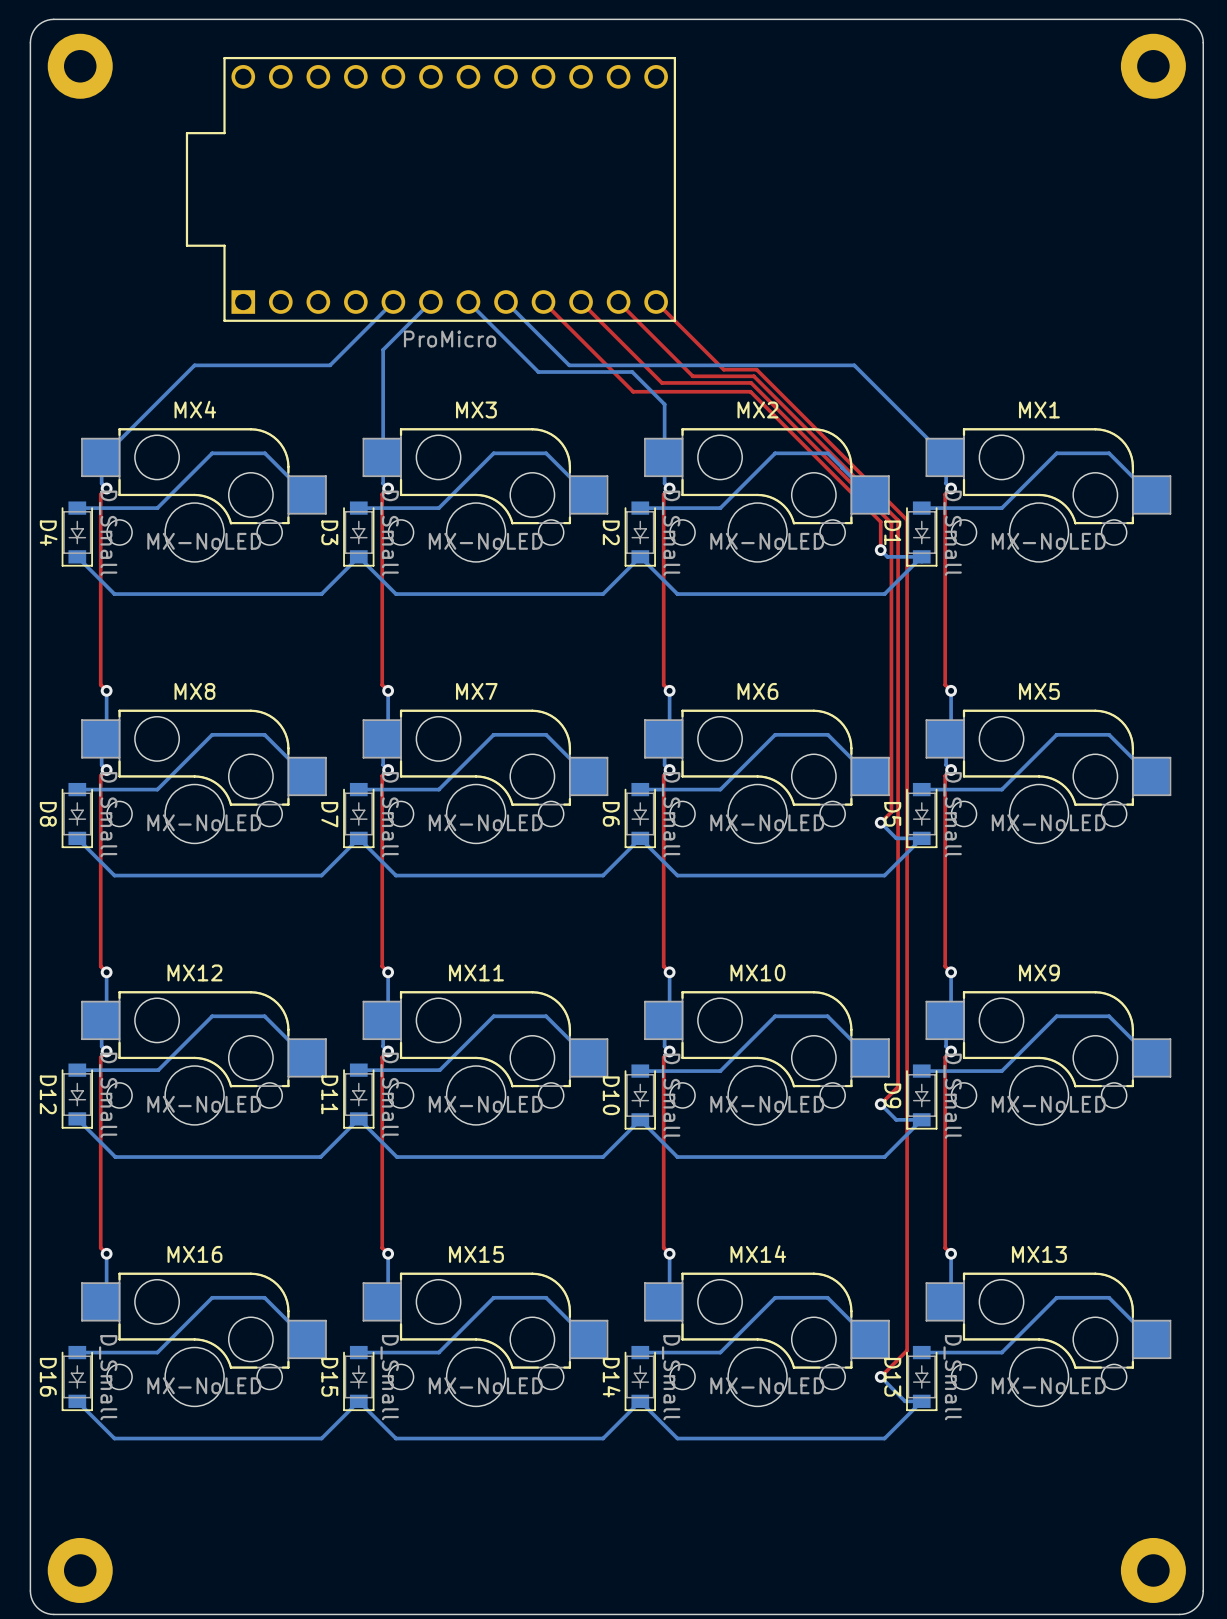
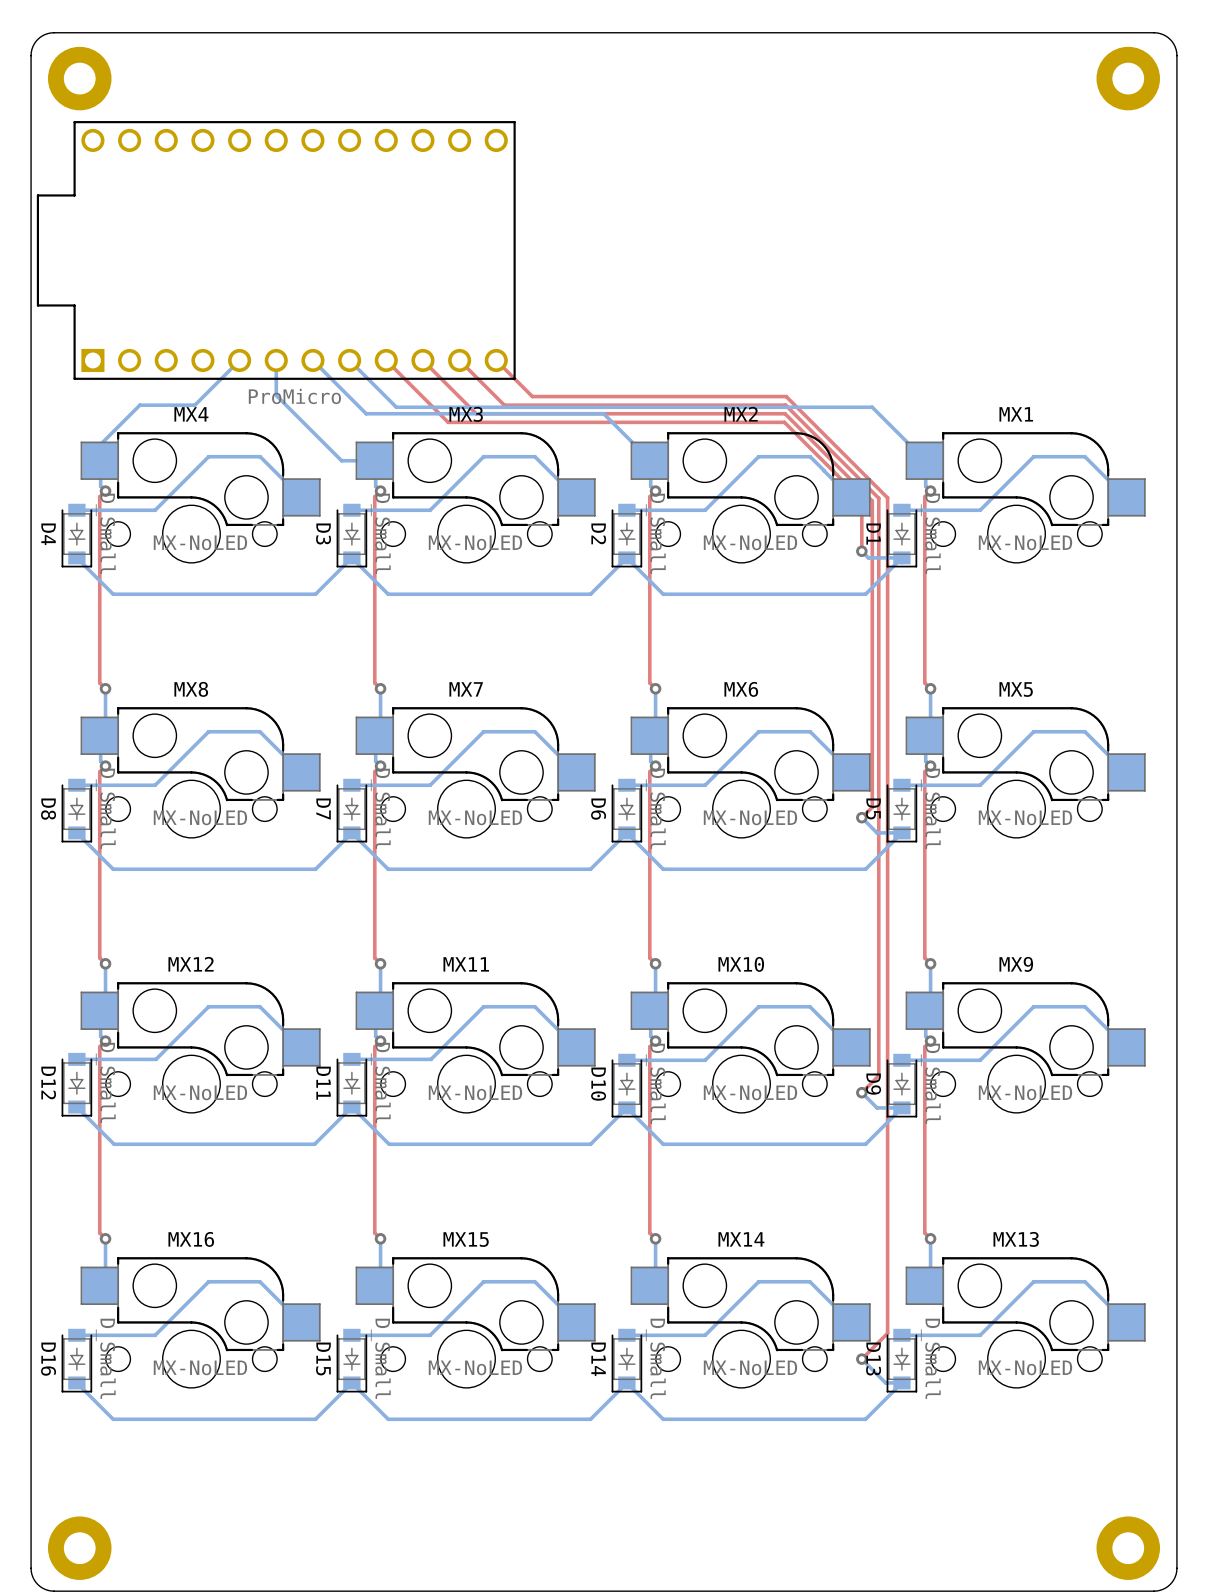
part position: (430, 189) -> (276, 250)
bottom track: (393, 302) (330, 365) (194, 365) (102, 457) -> none
bottom track: (430, 302) (383, 349) (383, 457) -> (276, 360) (276, 395) (341, 460) (375, 460)
bottom track: (468, 302) (538, 372) (632, 372) (664, 404) (664, 457) -> (312, 360) (366, 413) (603, 413) (650, 460)
bottom track: (505, 302) (569, 365) (854, 365) (946, 457) -> (349, 360) (396, 407) (872, 407) (925, 460)
top track: (543, 302) (633, 391) -> (496, 360) (532, 396) (620, 396)
top track: (581, 302) (661, 382) (751, 382) (891, 523) -> (422, 360) (476, 413) (785, 413) (872, 500) (872, 525)
top track: (618, 302) (692, 376) (753, 376) (898, 520) -> (459, 360) (504, 405) (785, 405) (878, 498) (878, 522)
top track: (656, 302) (723, 369) (756, 369) (907, 520) -> none
bottom track: none -> (239, 360) (194, 405) (139, 405) (100, 444) (100, 460)
top track: none -> (386, 360) (448, 422) (784, 422) (861, 499) (861, 523)
top track: (750, 391) (880, 521) -> (734, 396) (786, 396) (887, 497) (887, 521)

